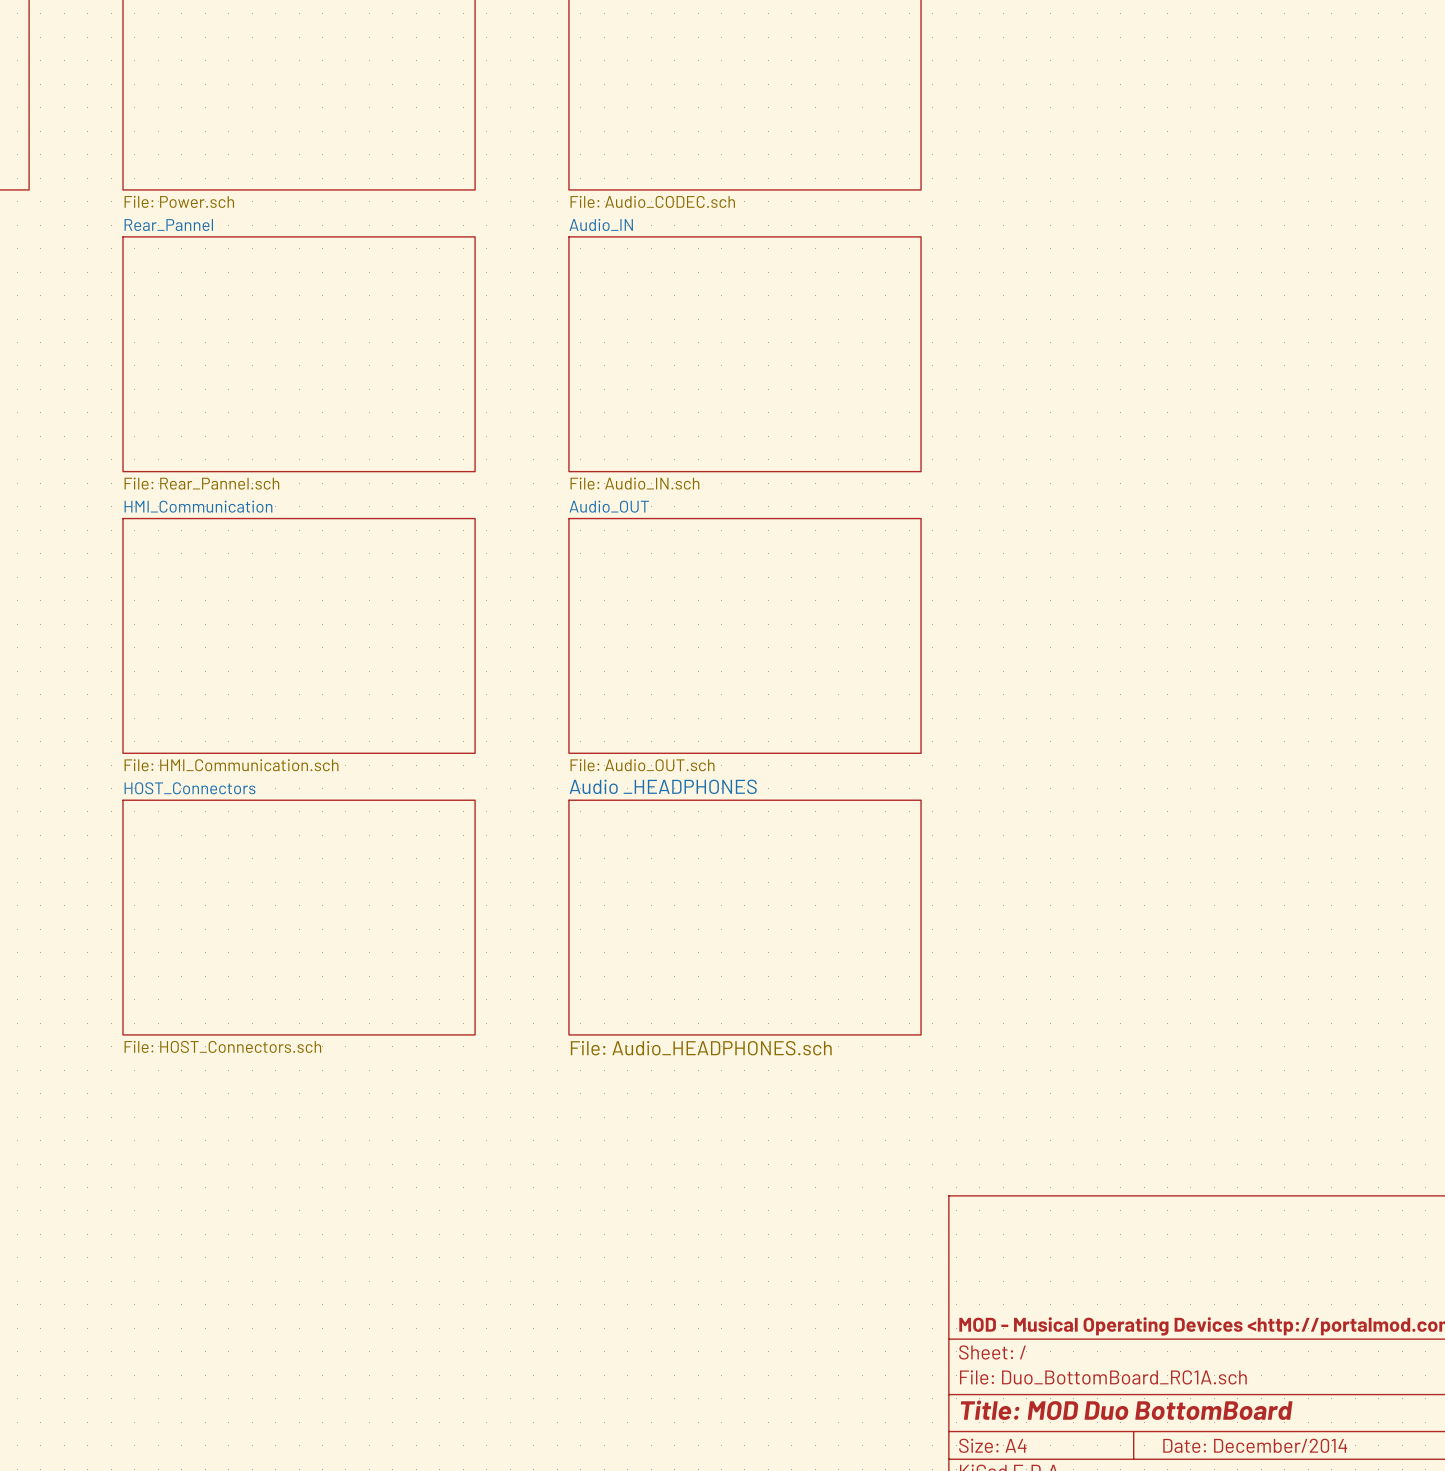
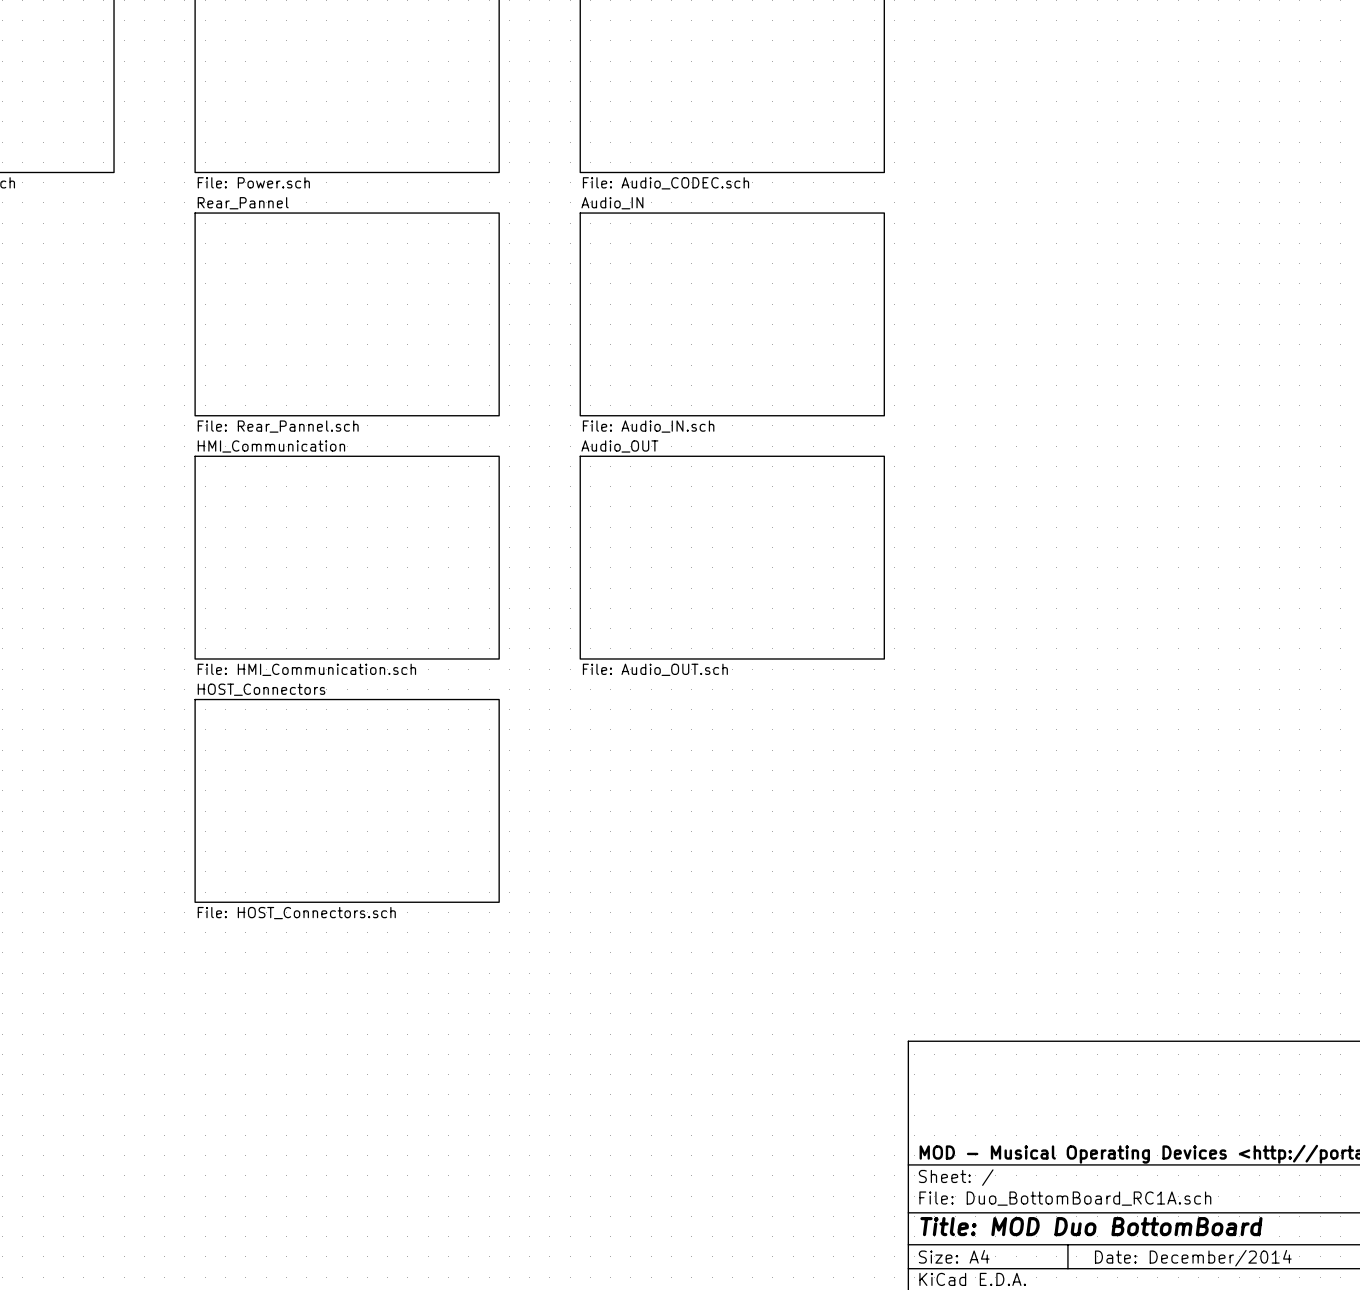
sheet Audio _HEADPHONES: File: Audio_HEADPHONES.sch (744, 917) -> none

